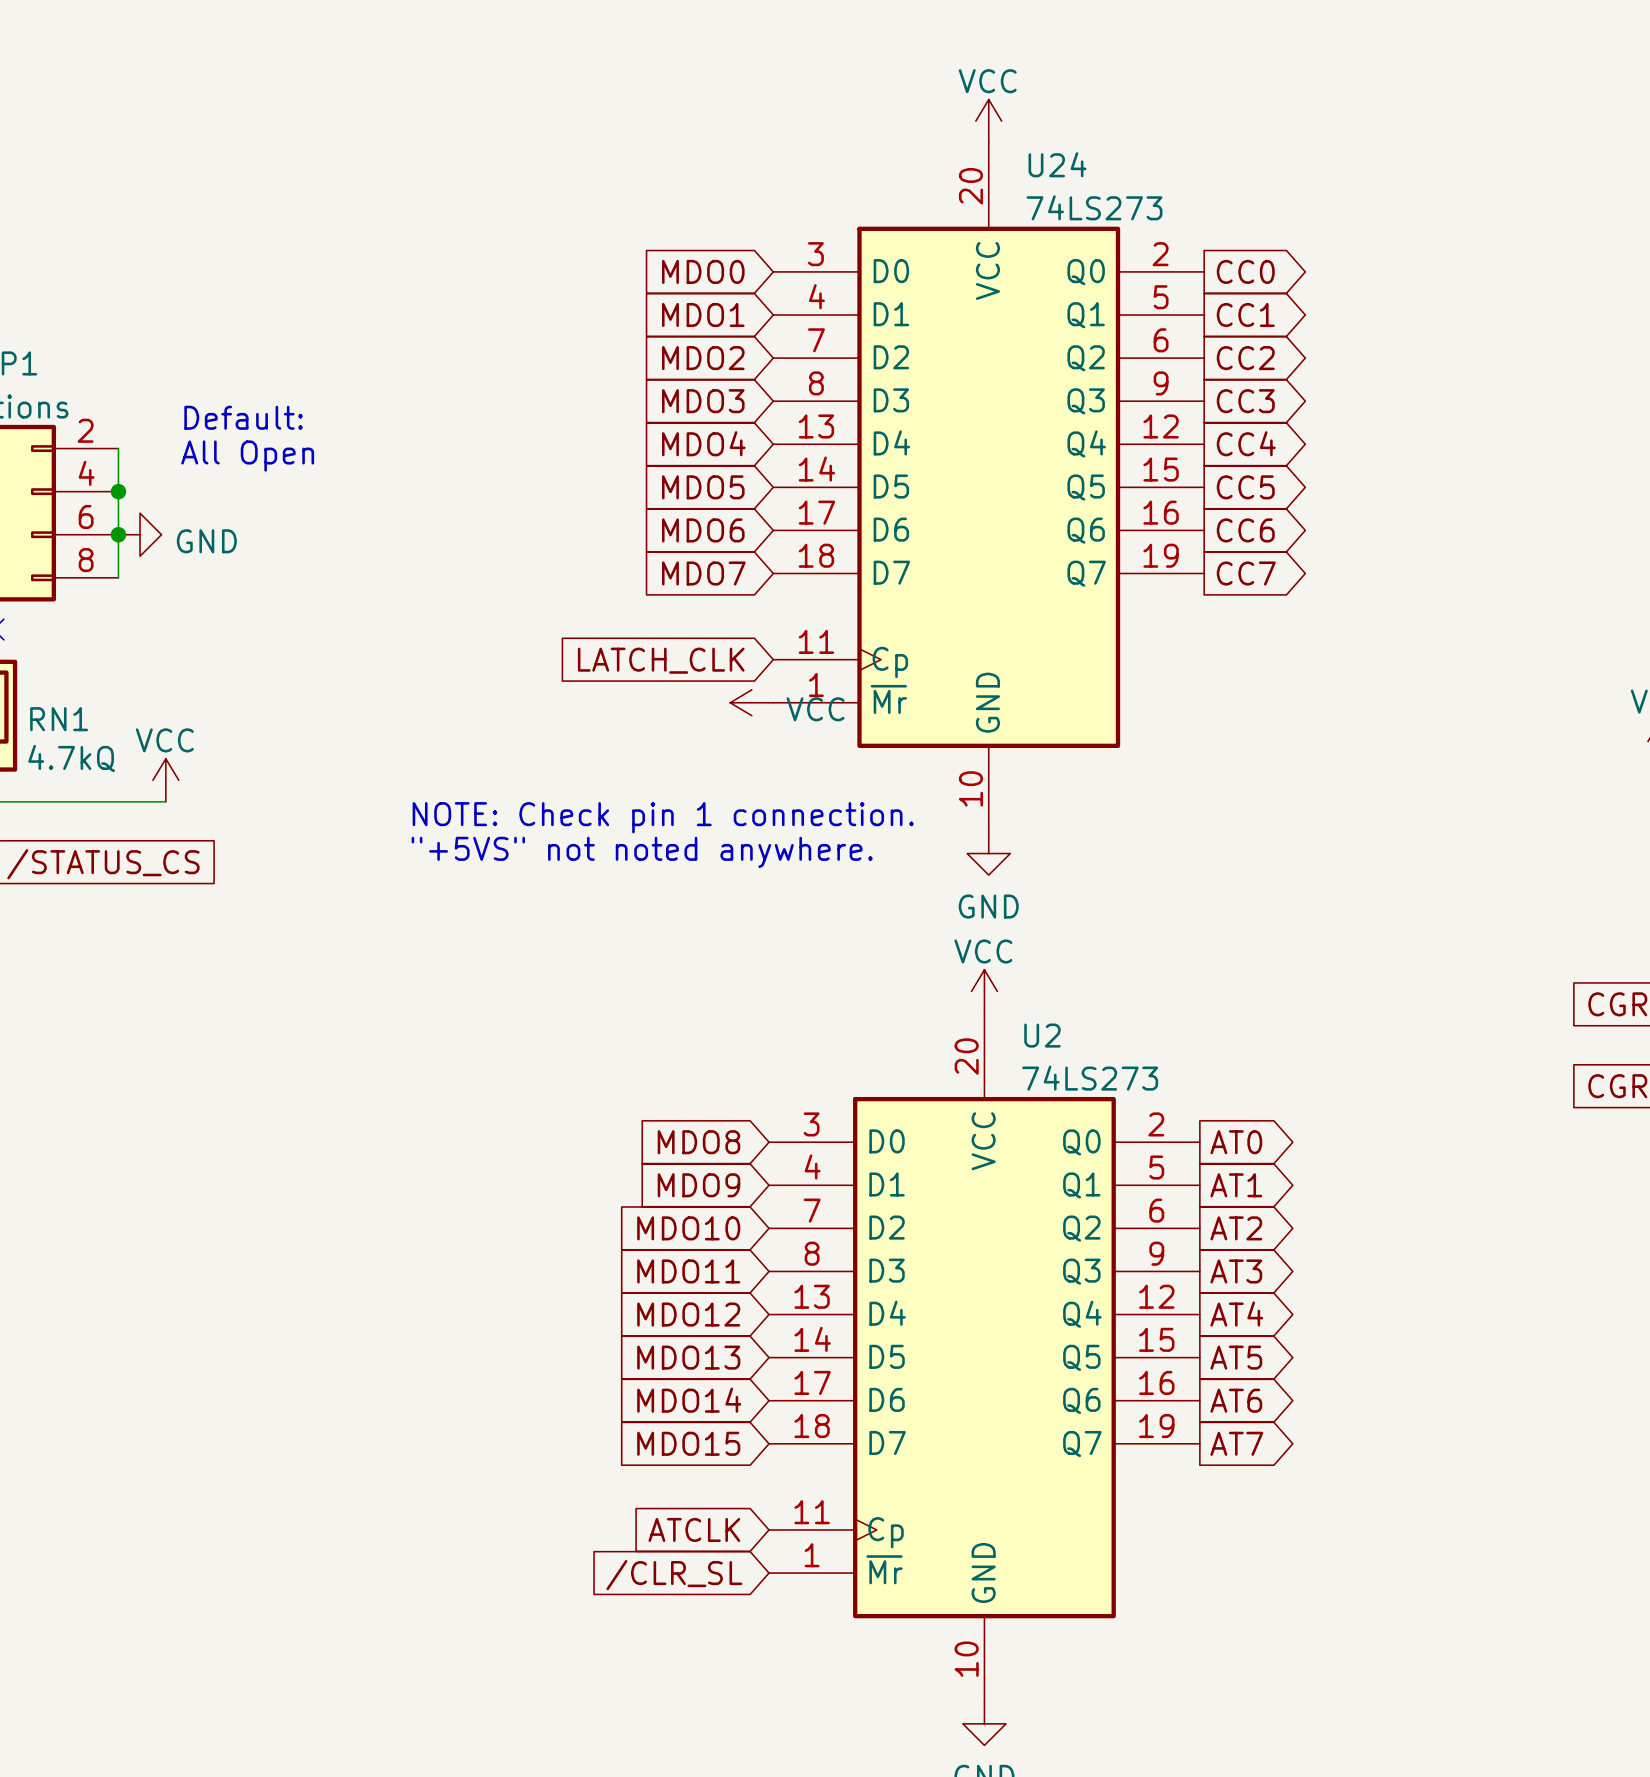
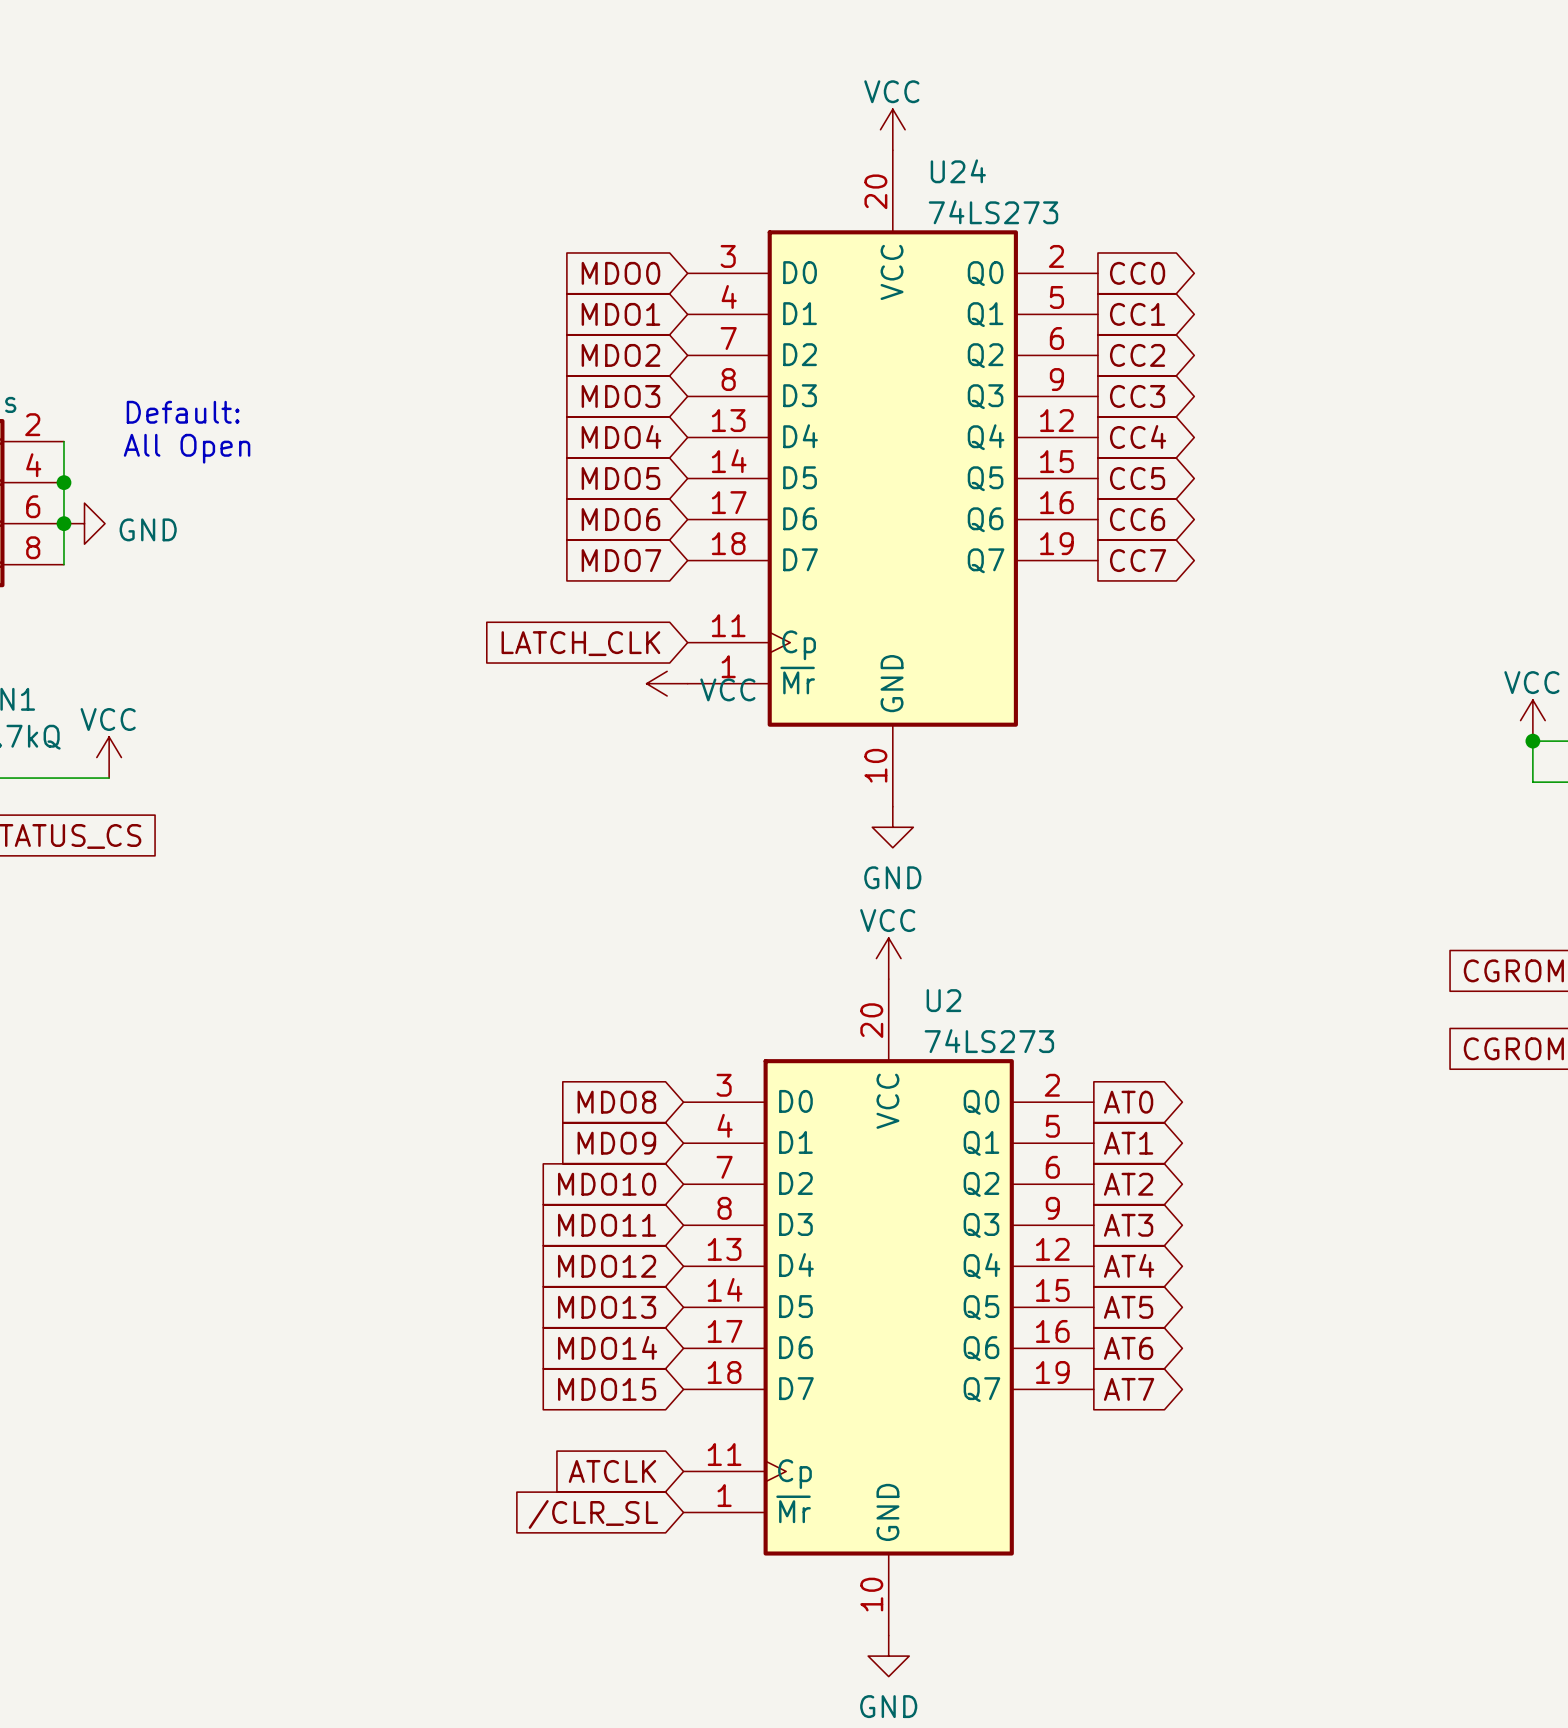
text: NOTE: Check pin 1 connection. (663, 817) -> none
text: "+5VS" not noted anywhere. (642, 852) -> none

